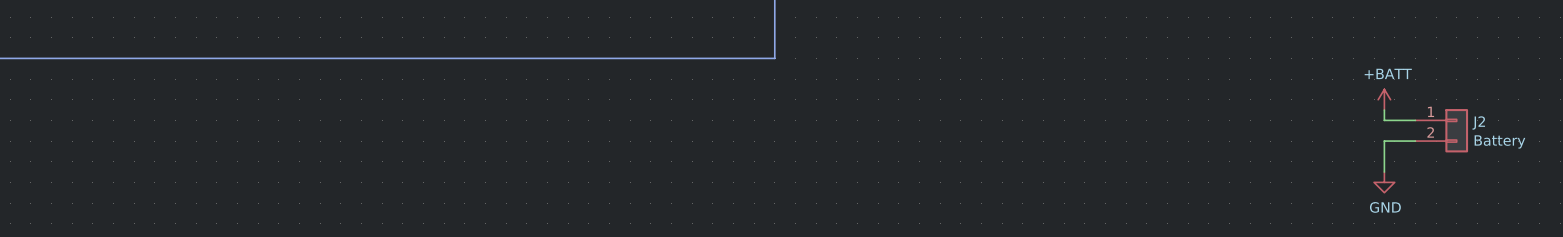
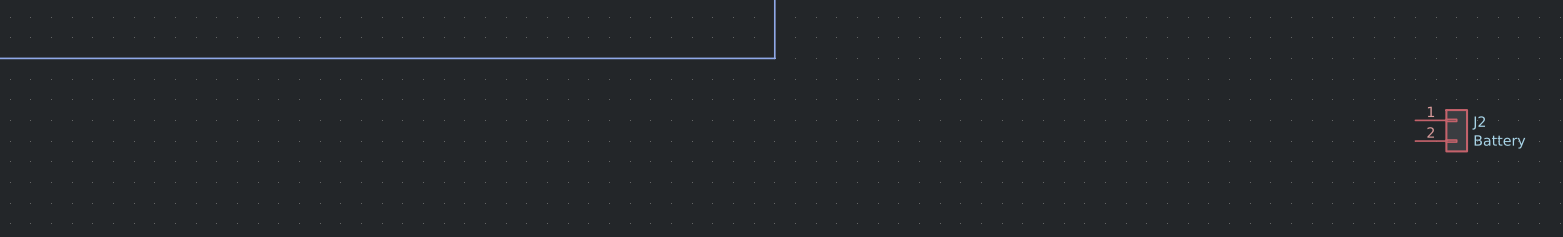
power symbol: +BATT (1384, 99) -> none
wire: (1384, 110) (1384, 120) (1415, 120) -> none
wire: (1415, 141) (1384, 141) (1384, 172) -> none
power symbol: GND (1384, 182) -> none

